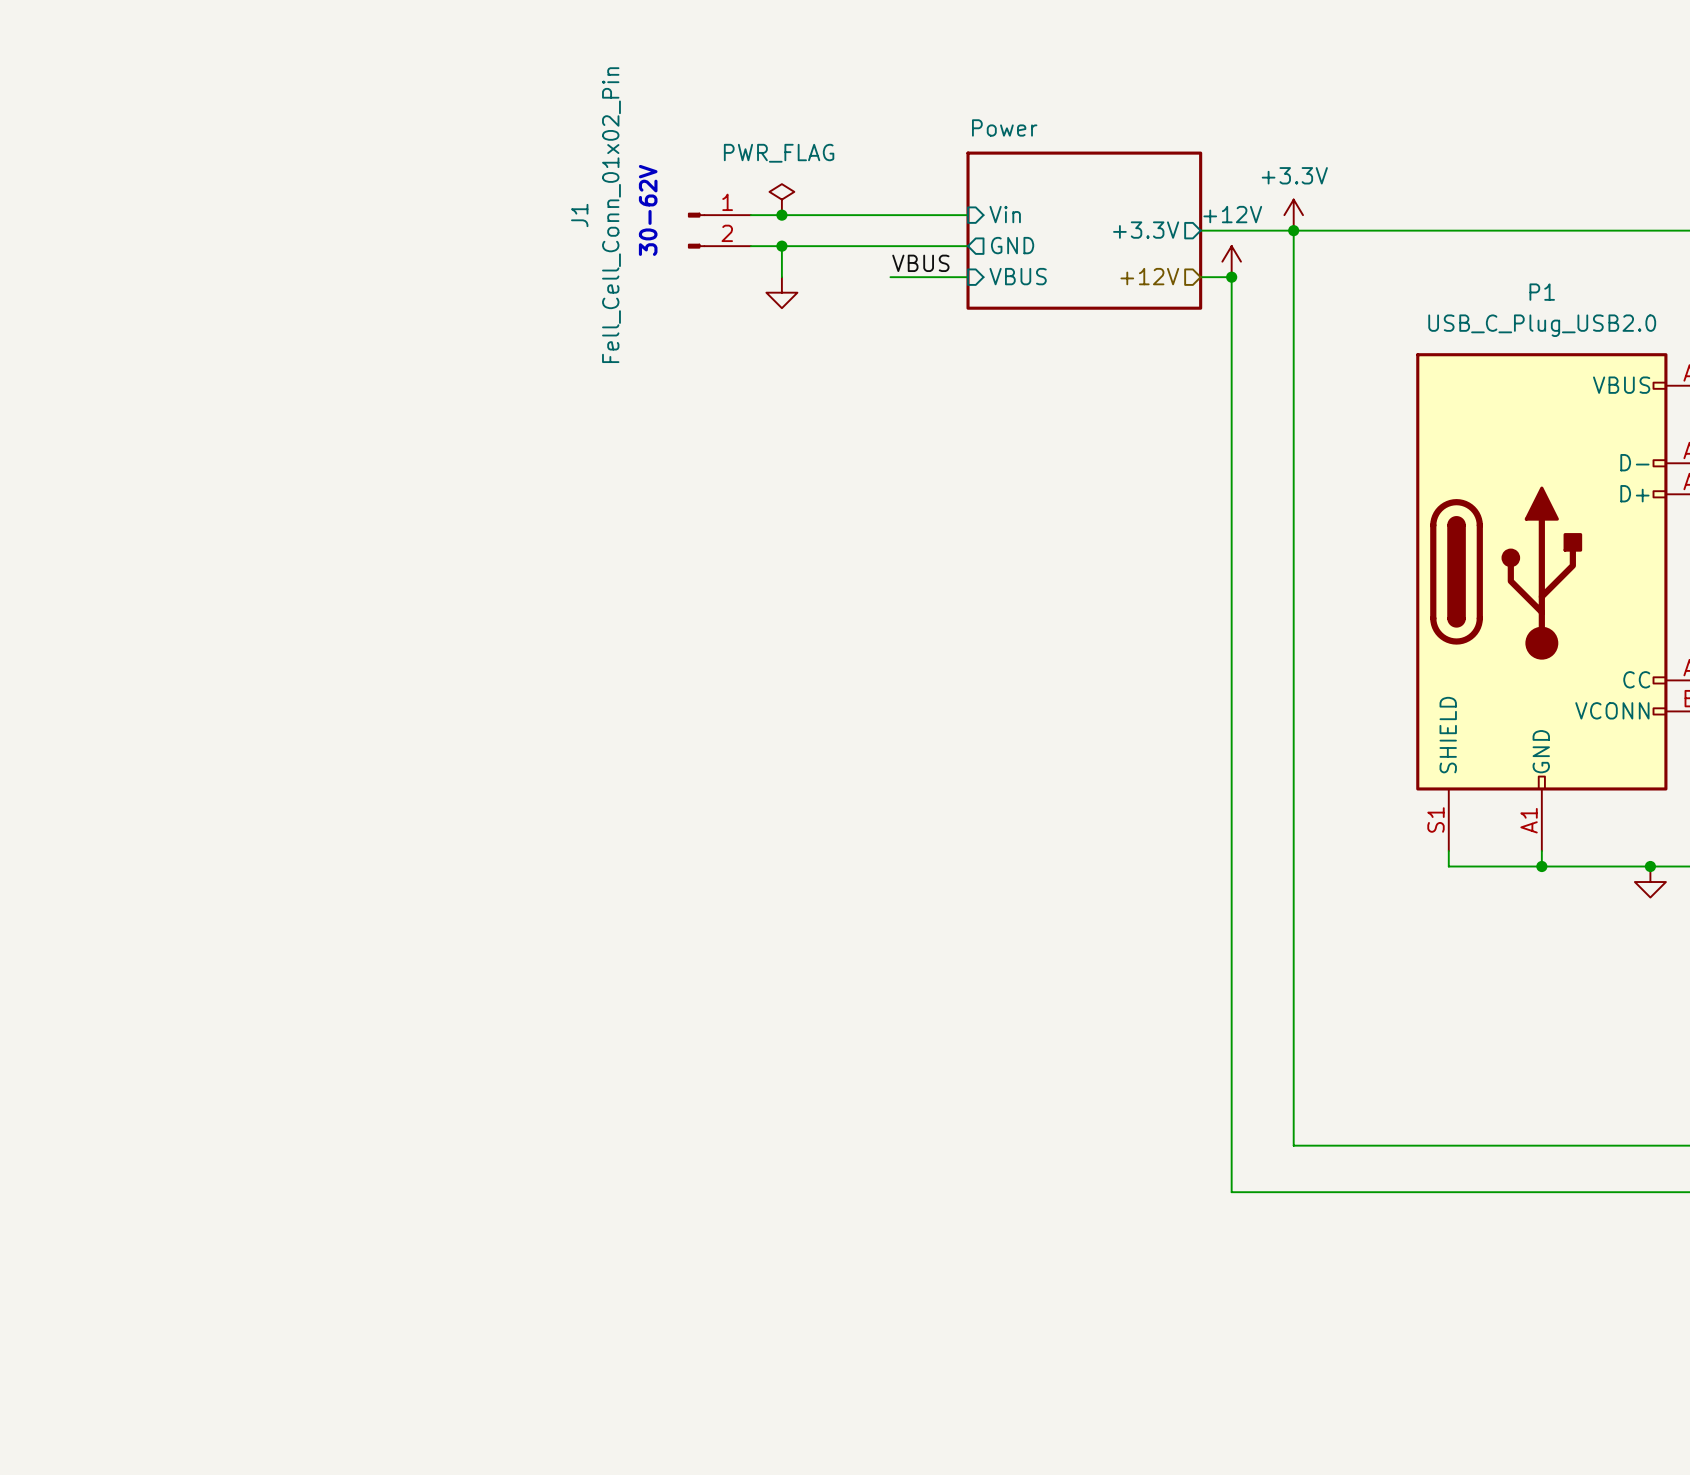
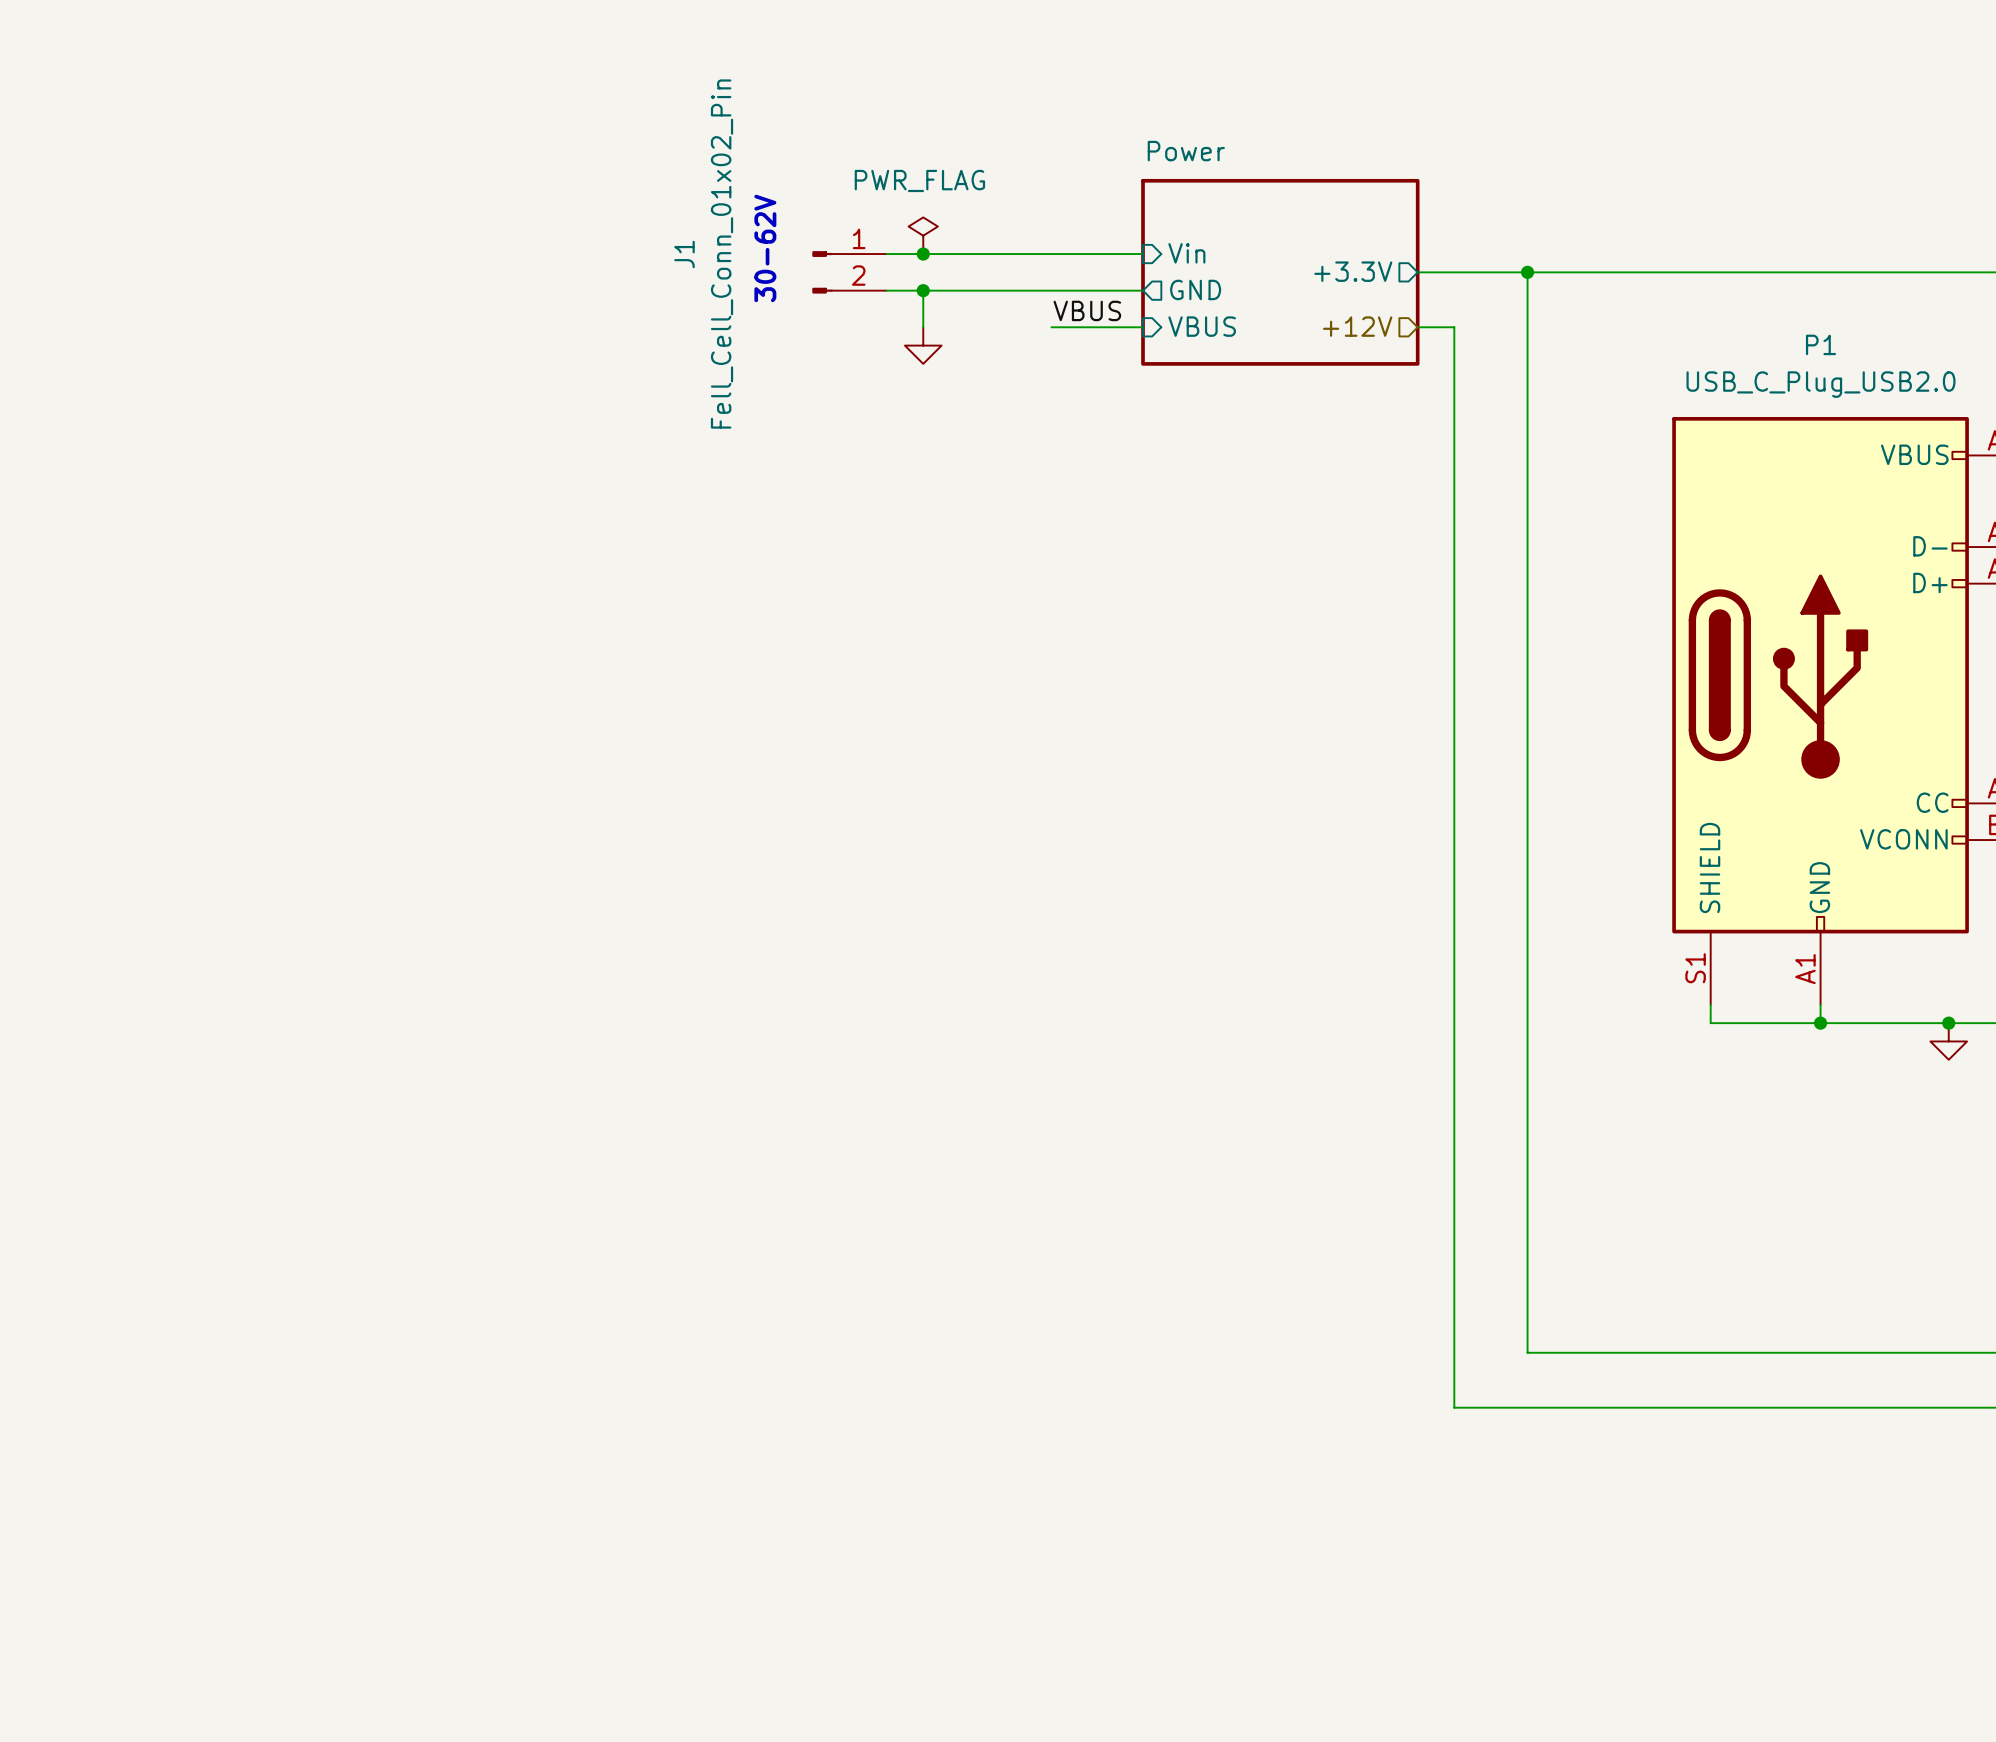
power symbol: +3.3V (1293, 215) -> none
power symbol: +12V (1231, 261) -> none
junction: (1231, 277) -> none

